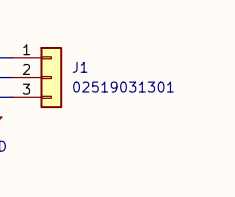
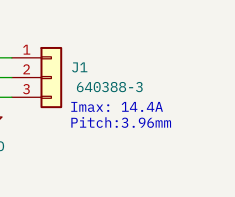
J1 value: 02519031301 (123, 87) -> 640388-3 (109, 87)
text: none -> Imax: 14.4A (117, 106)
text: none -> Pitch:3.96mm (121, 122)

